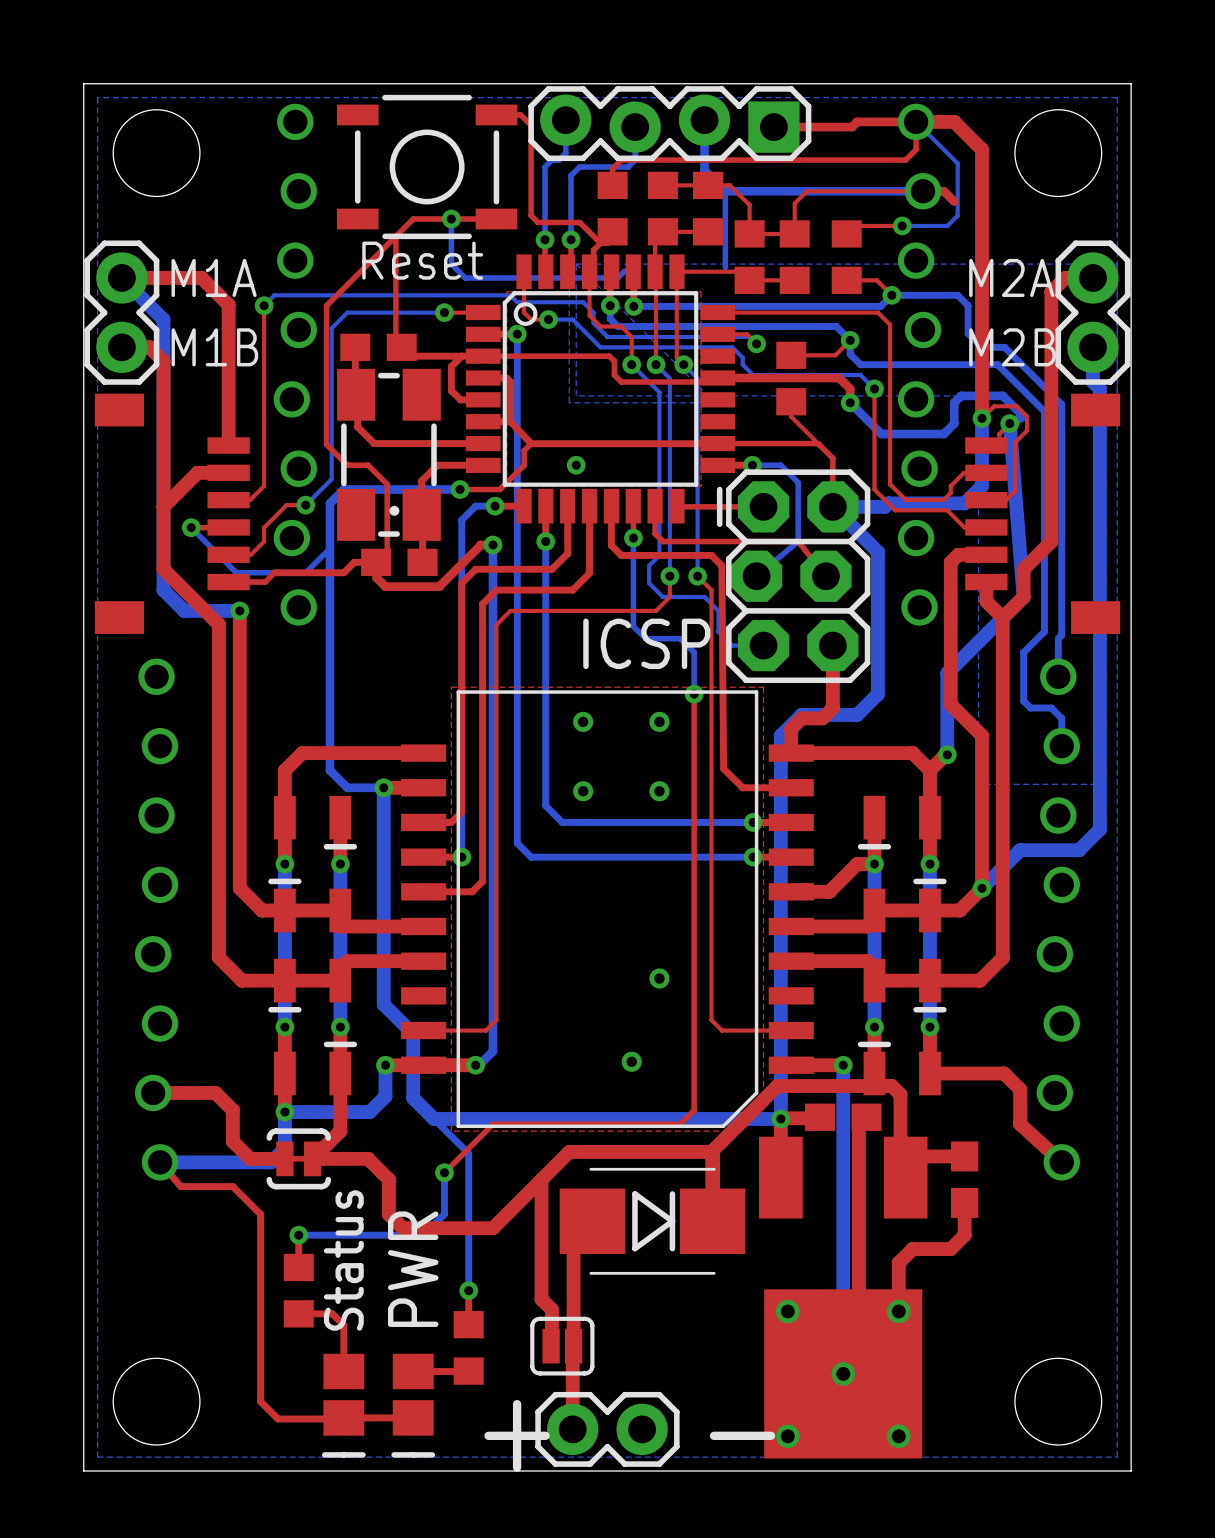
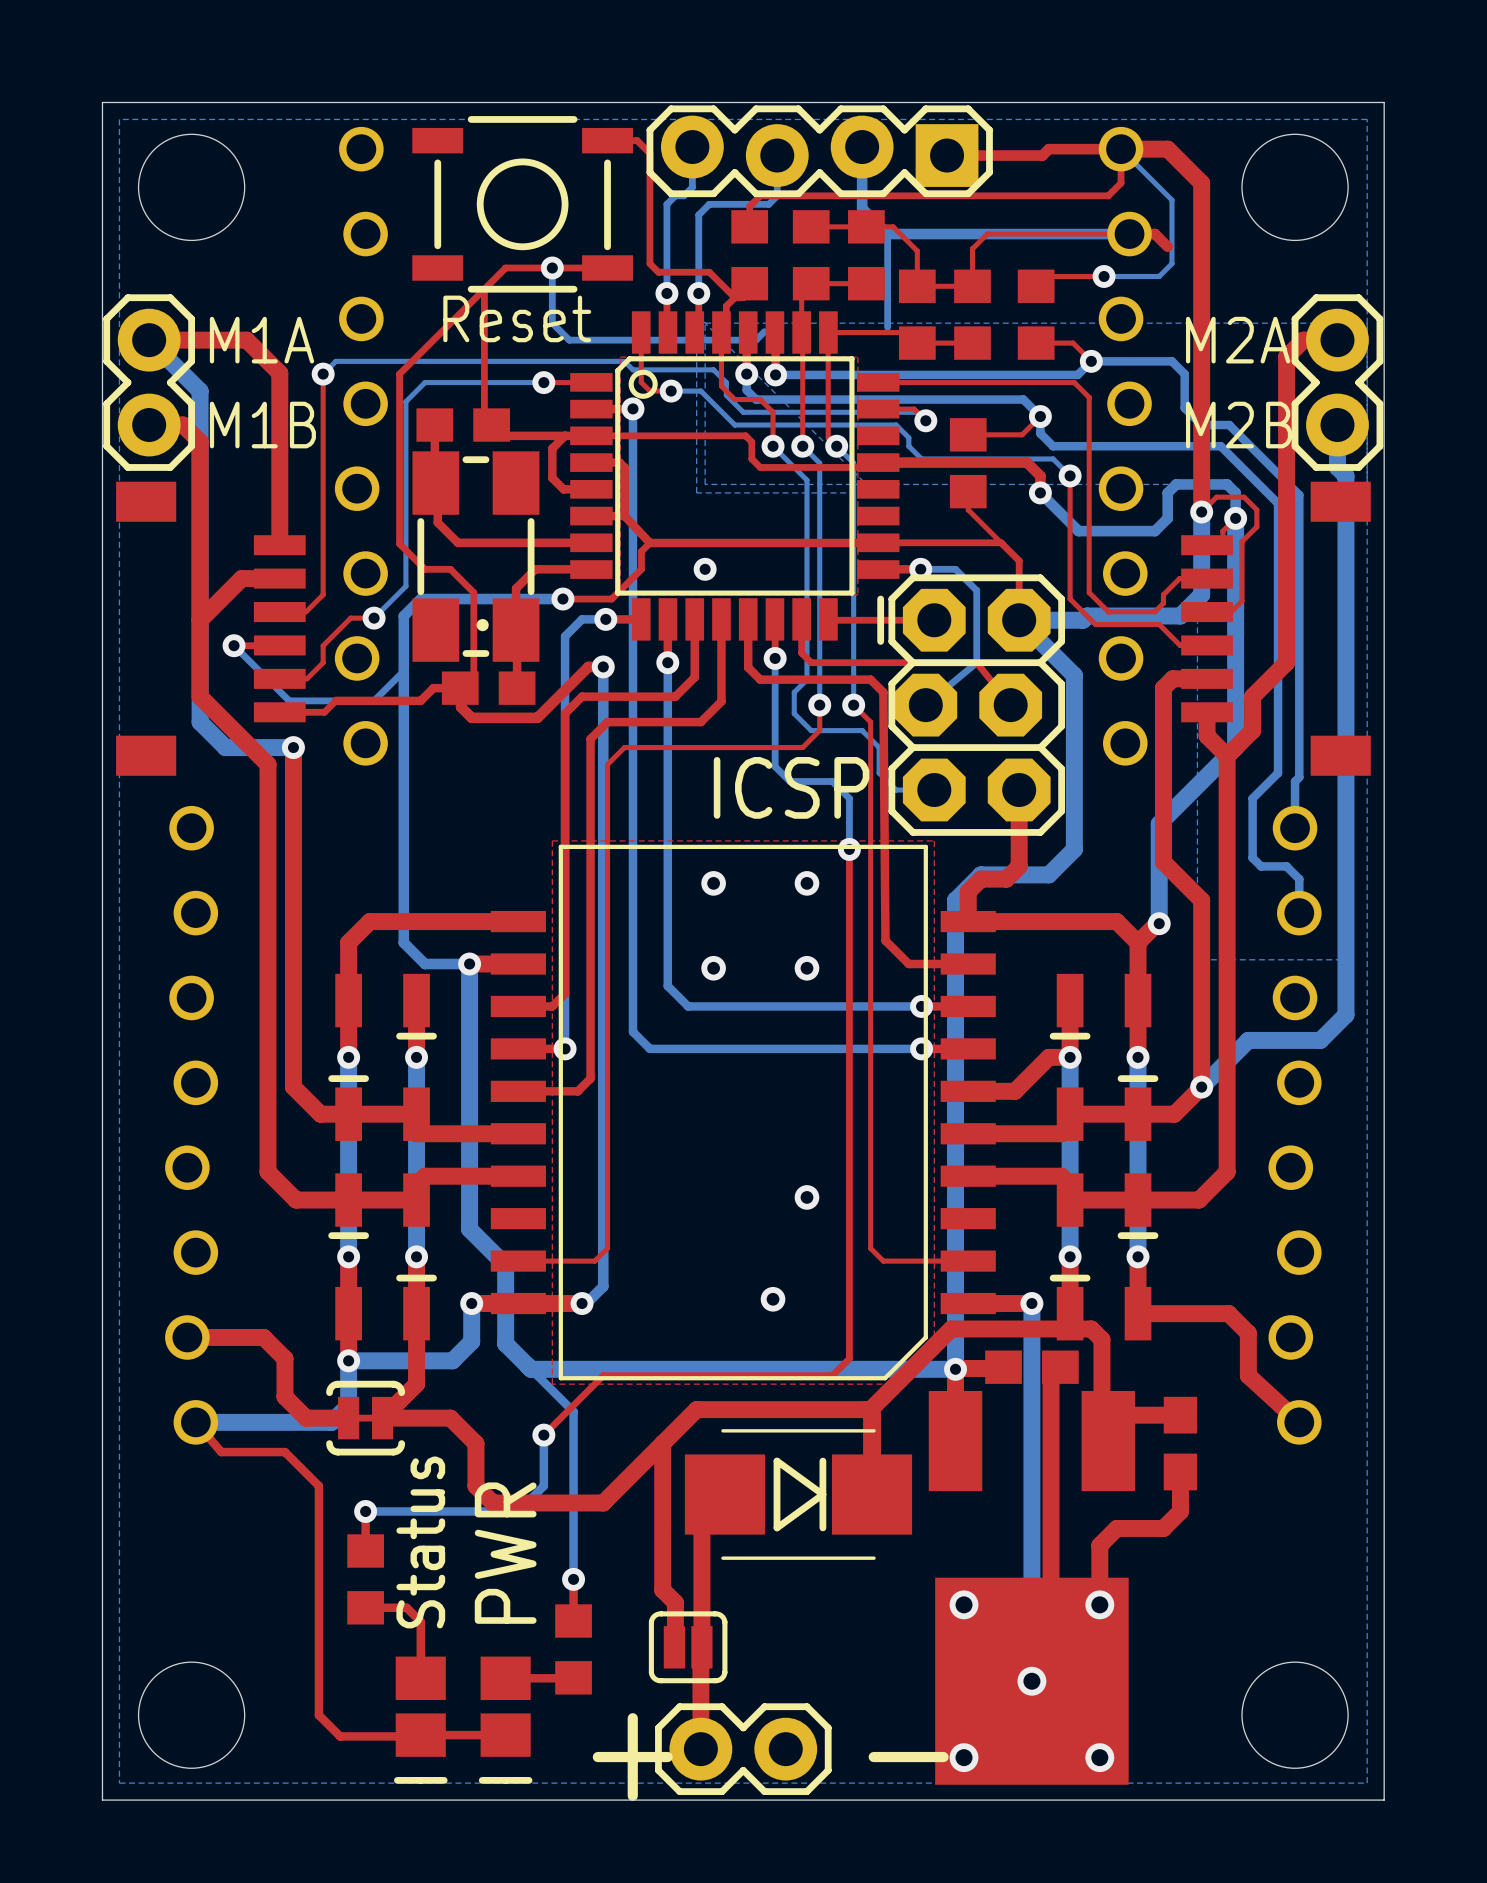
bottom track: (1009, 402) (1023, 416) (1009, 423) (1023, 597) (1009, 610) -> (1235, 492) (1235, 747)

